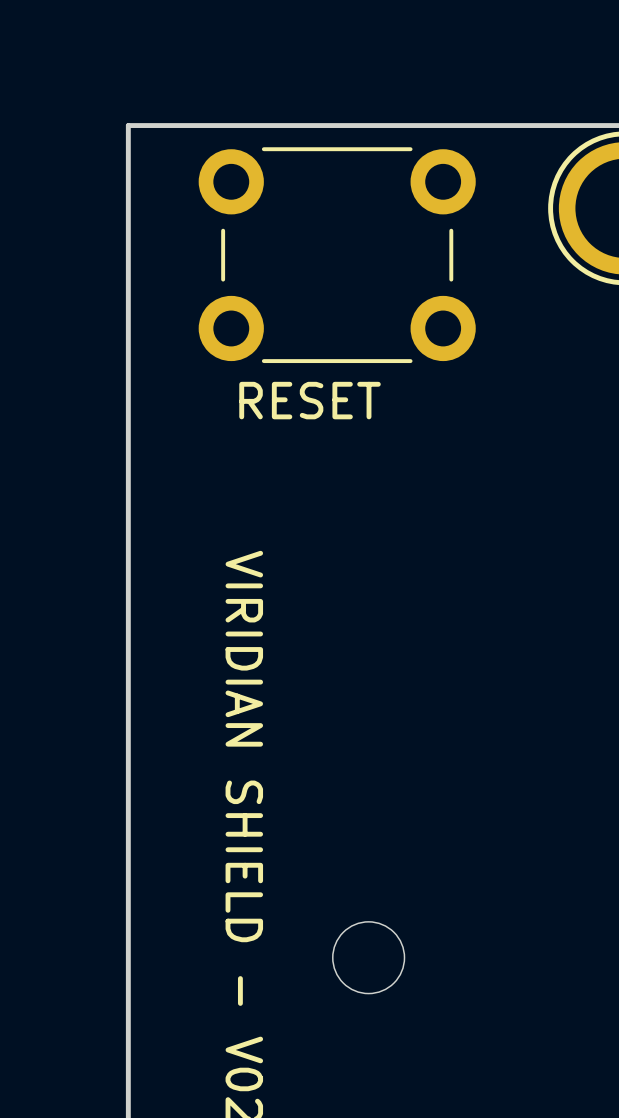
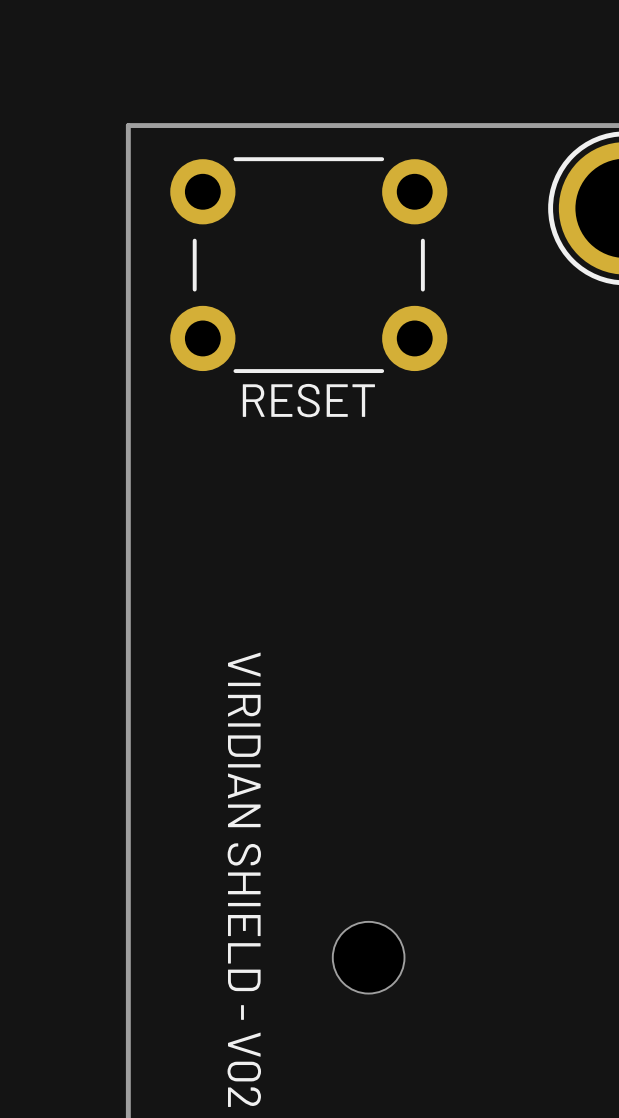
part position: (337, 255) -> (308, 265)

